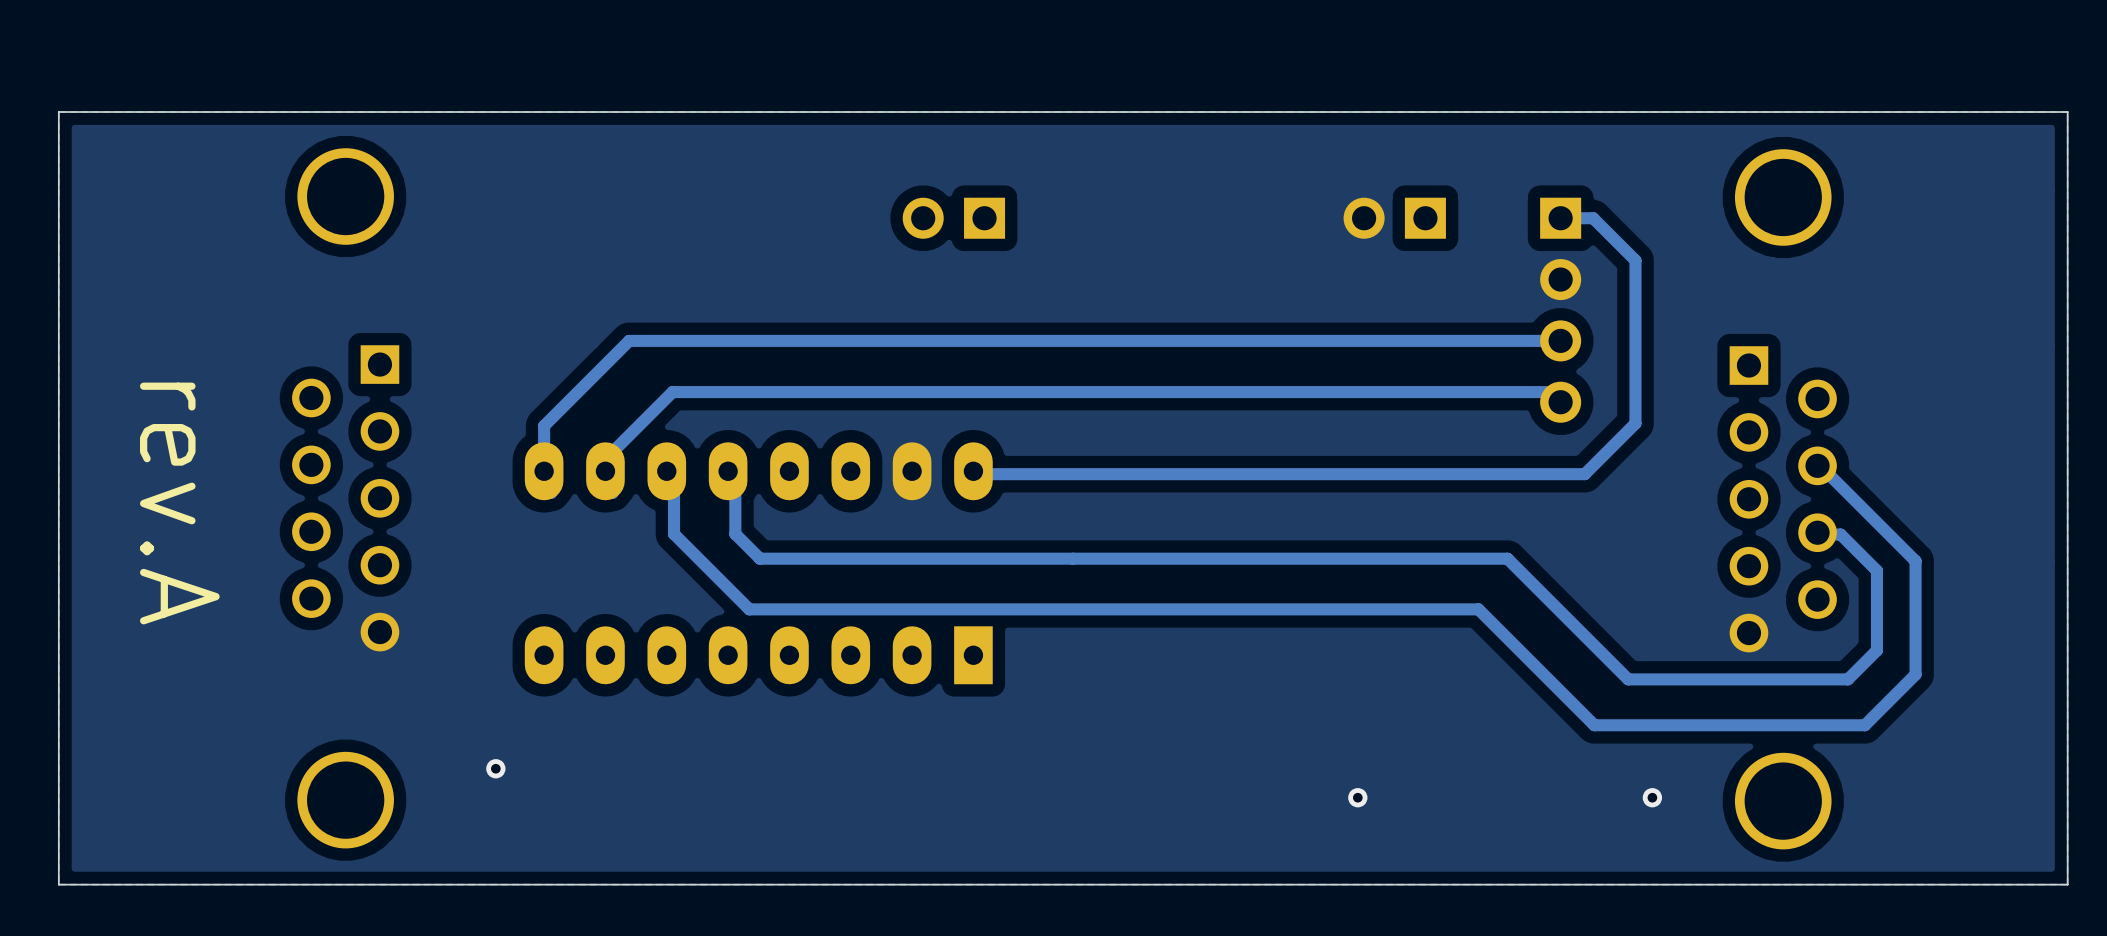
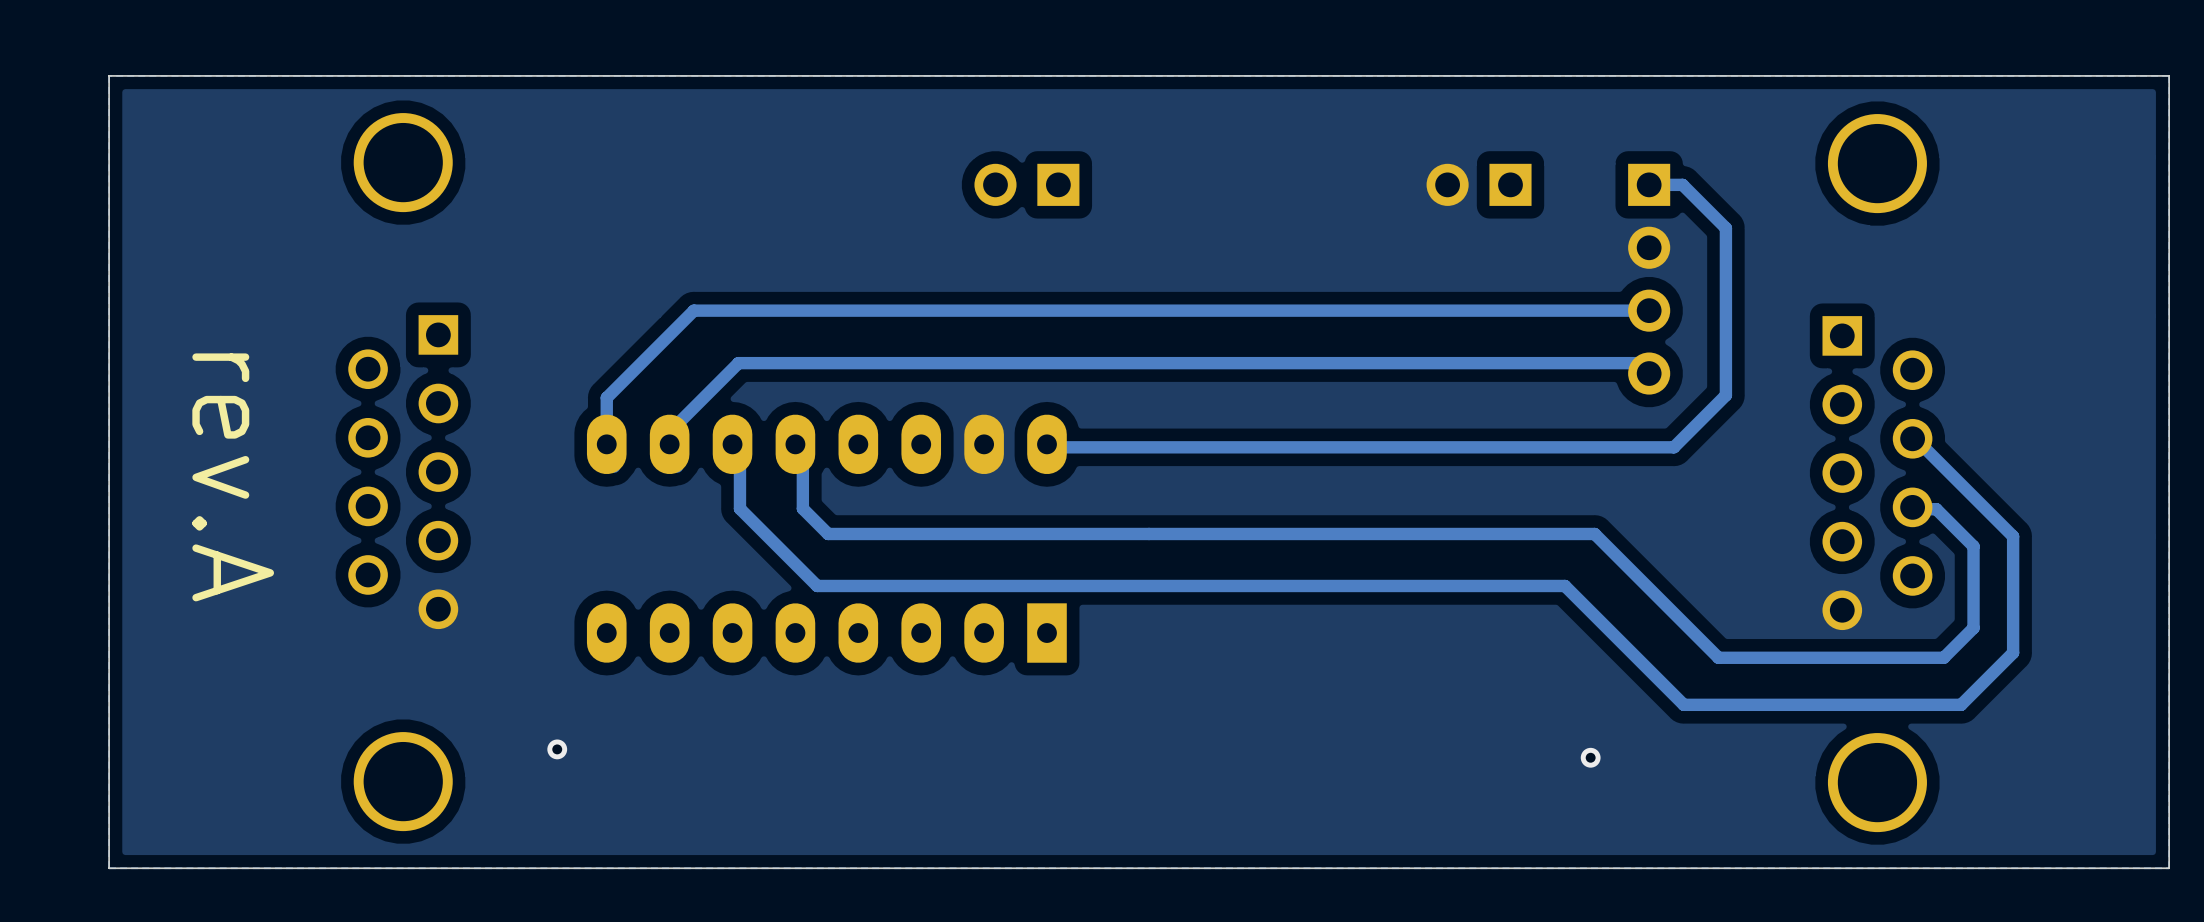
via: none -> (1590, 757)
via: (1357, 797) -> none
via: (1652, 797) -> none

